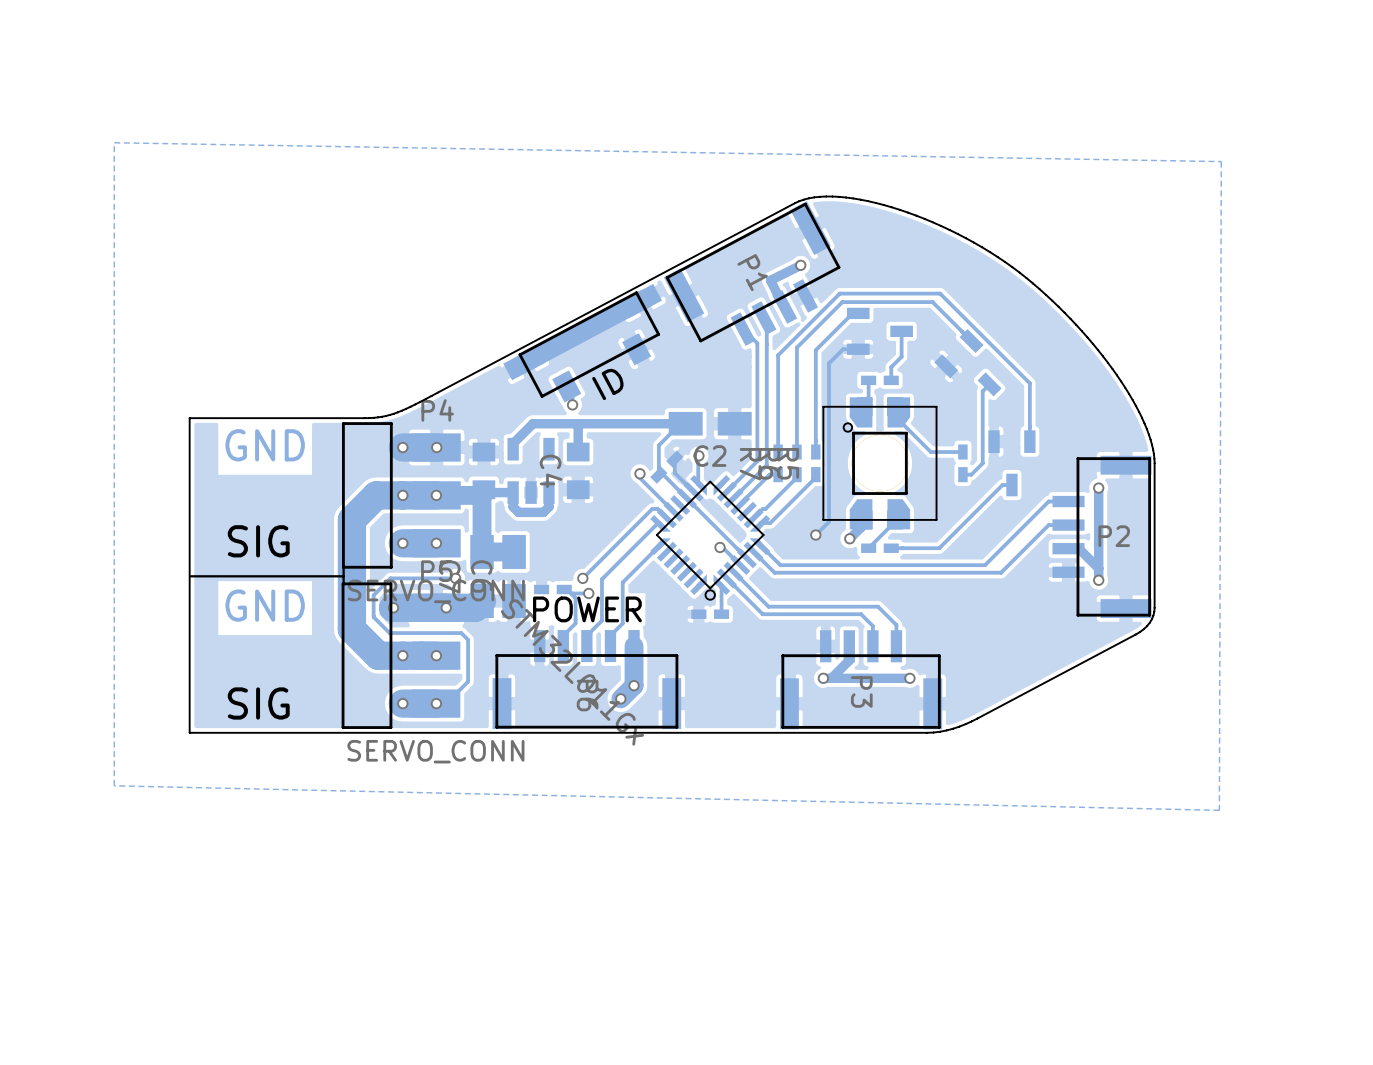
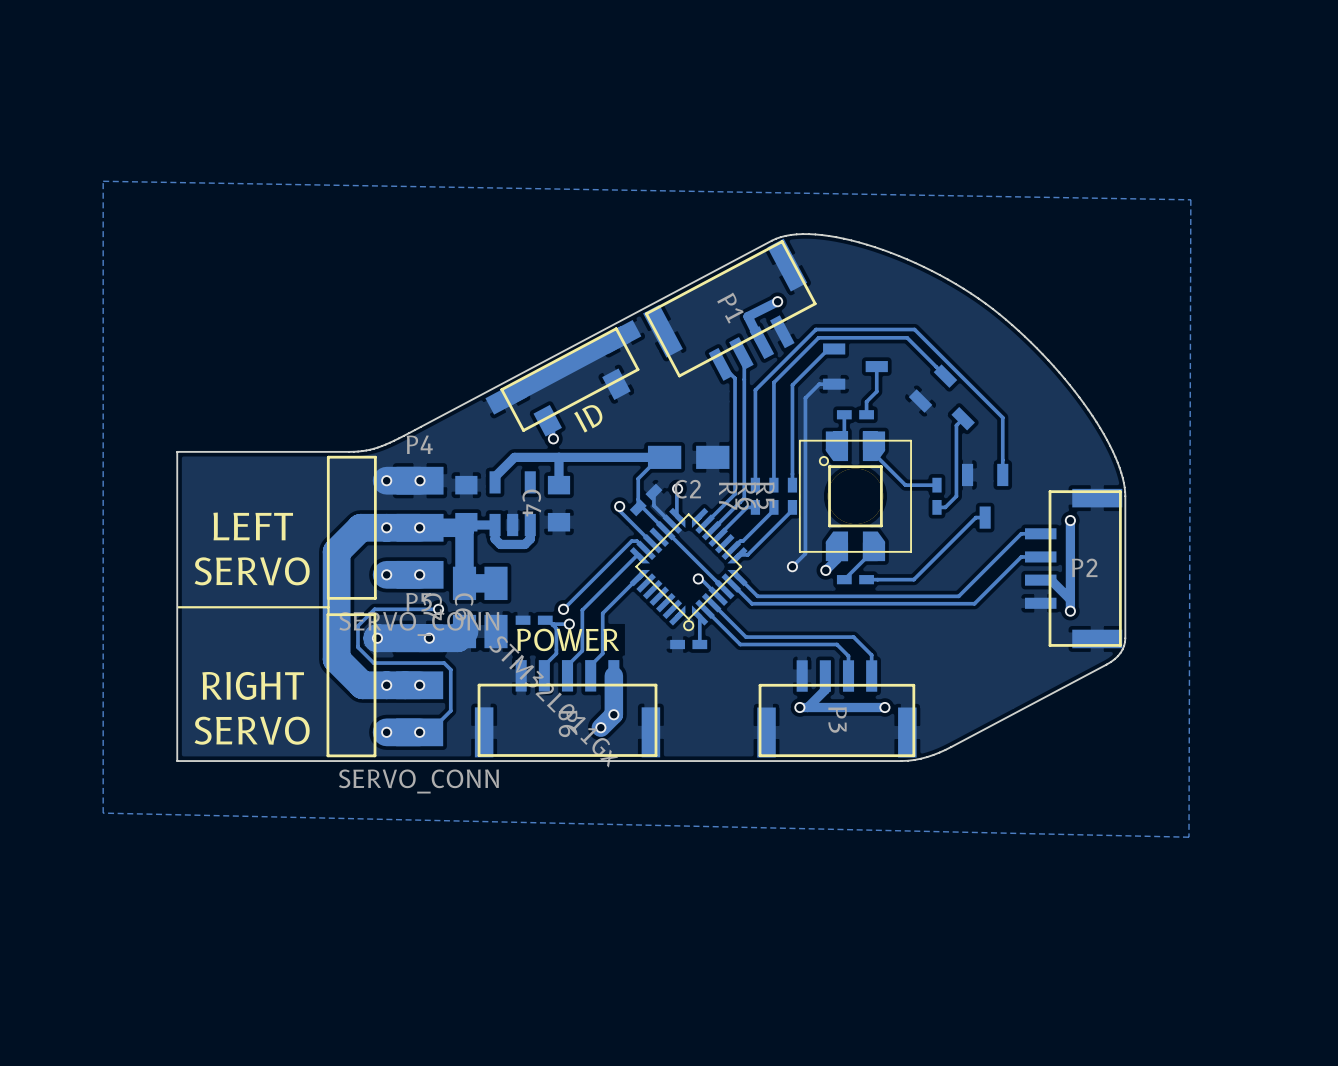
text: GND (265, 445) -> none
text: none -> LEFT (253, 526)
text: SIG (258, 541) -> SERVO (252, 571)
text: GND (265, 605) -> none
text: none -> RIGHT (253, 685)
text: SIG (258, 703) -> SERVO (252, 730)

